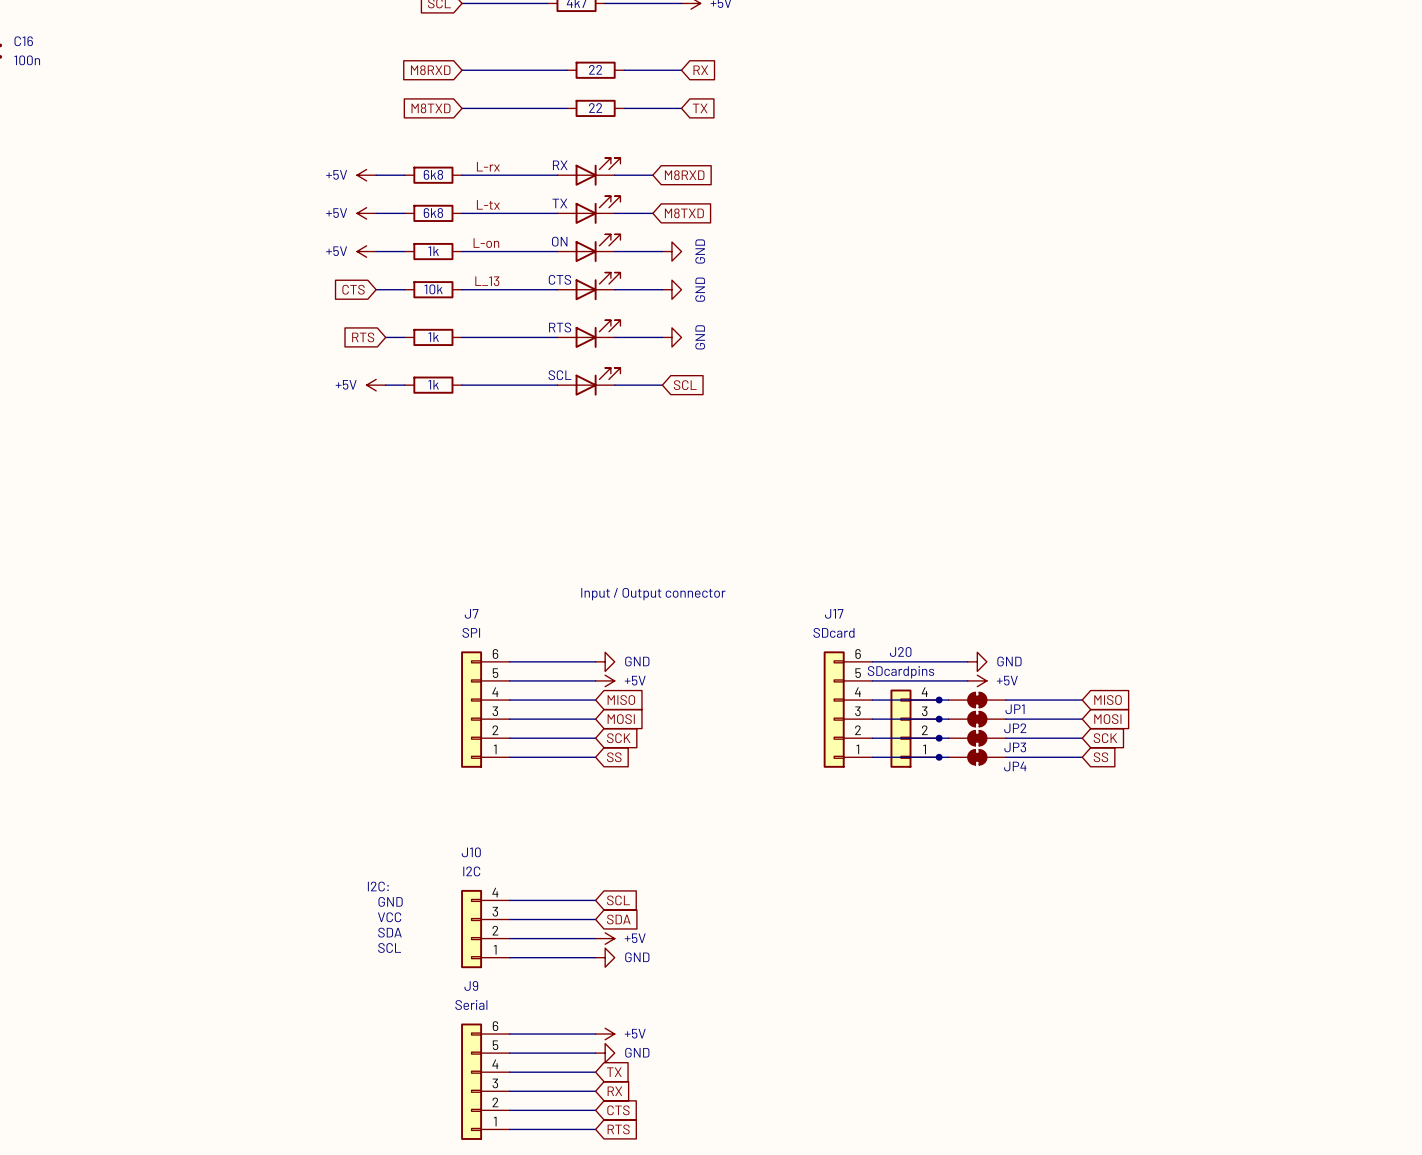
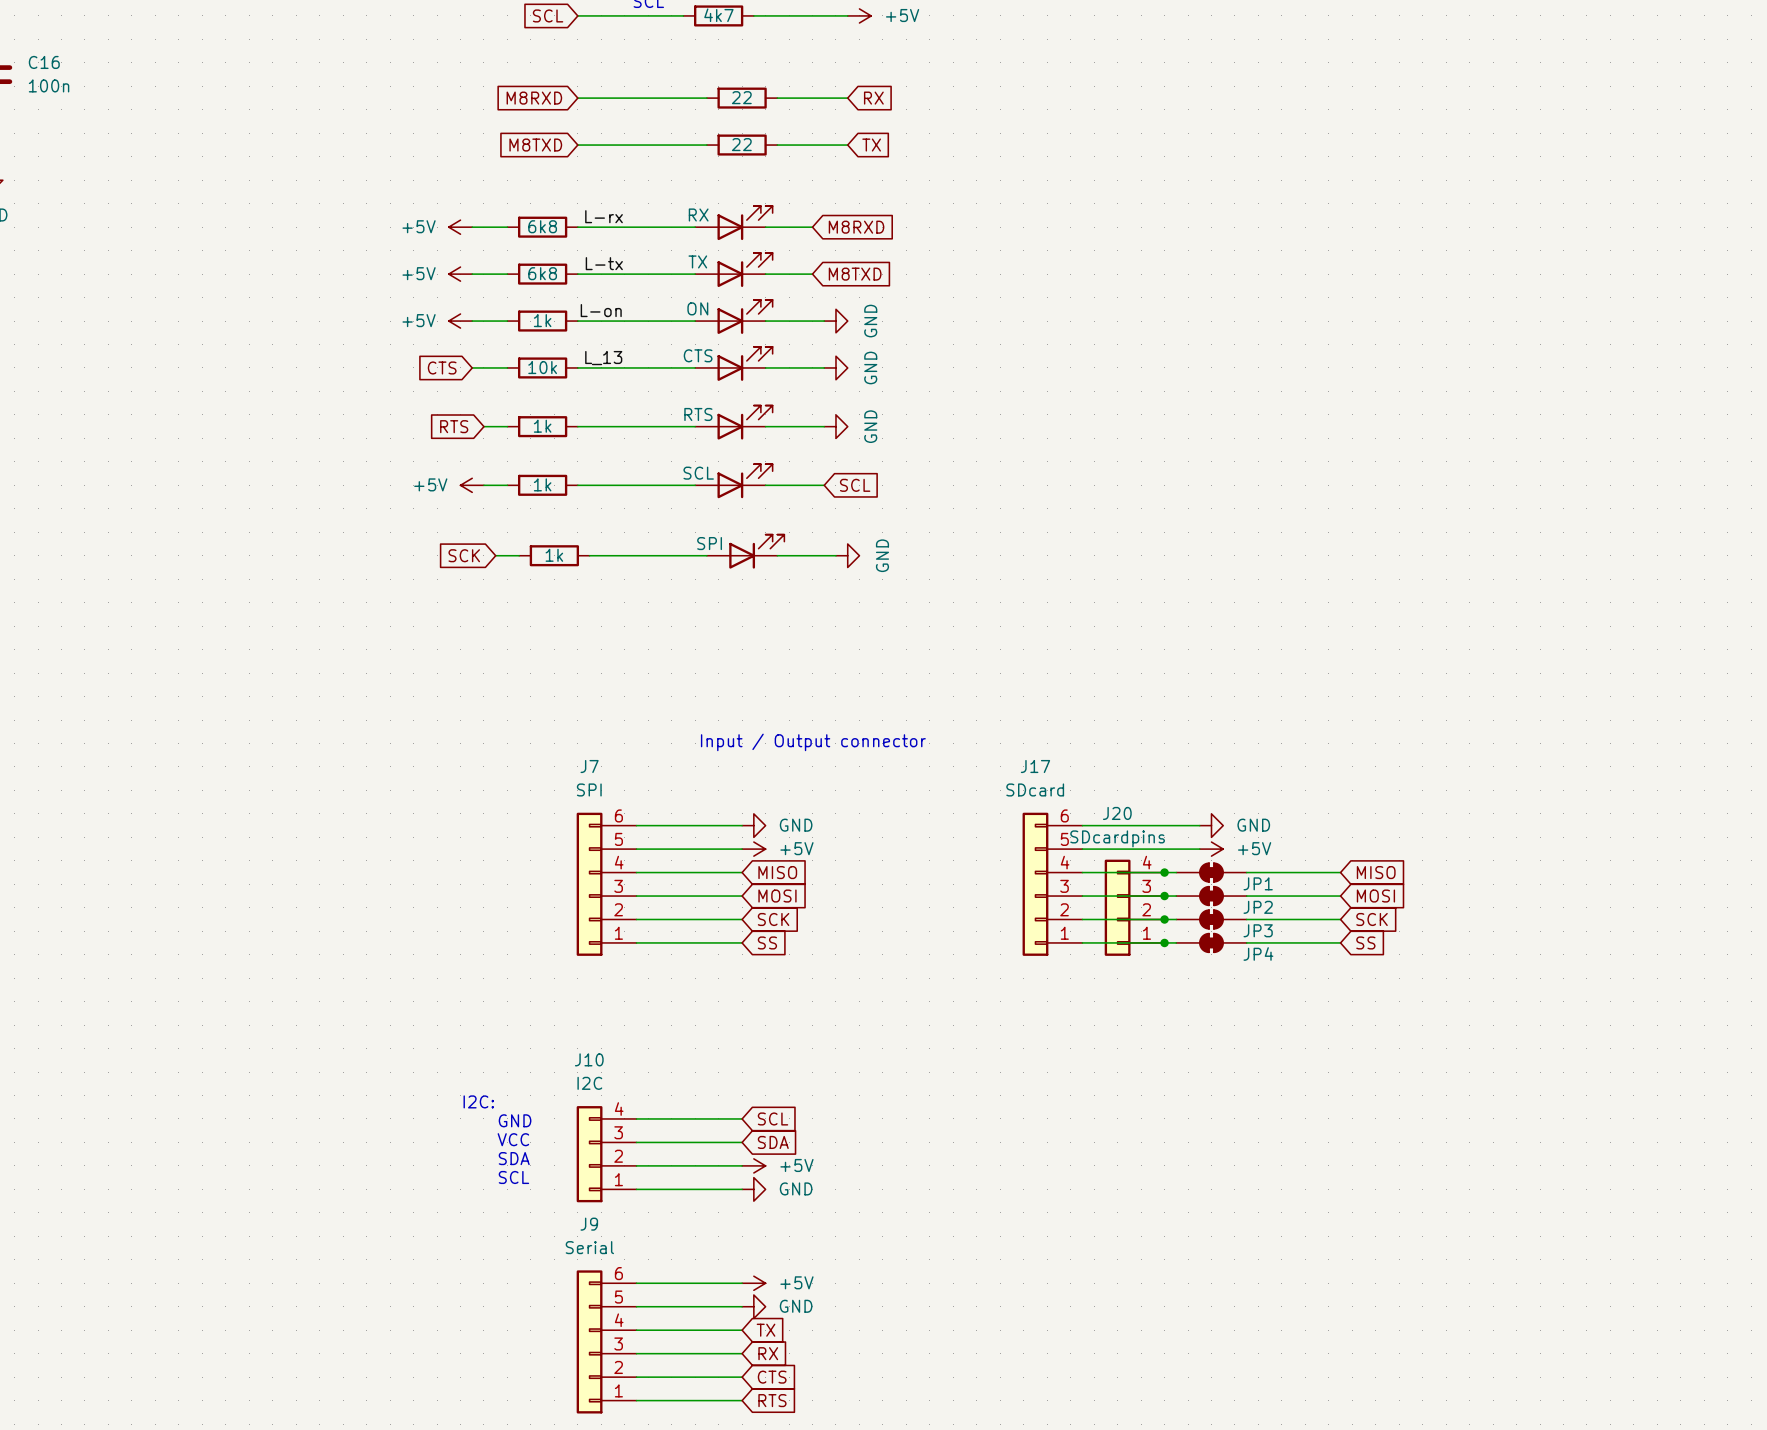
part: none -> SPI (745, 551)
global label: none -> SCK (464, 555)
wire: none -> (495, 555) (519, 555)
part: none -> 1k (554, 555)
wire: none -> (589, 555) (706, 555)
wire: none -> (777, 555) (835, 555)
power symbol: none -> GND (847, 555)

